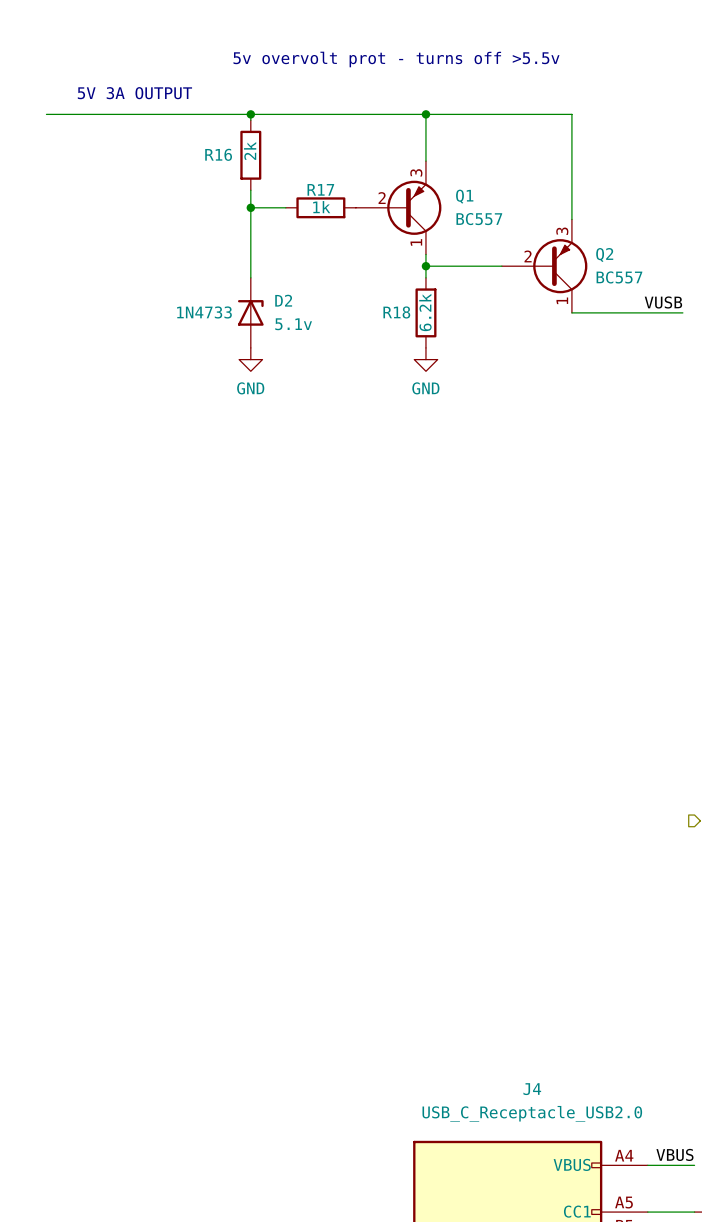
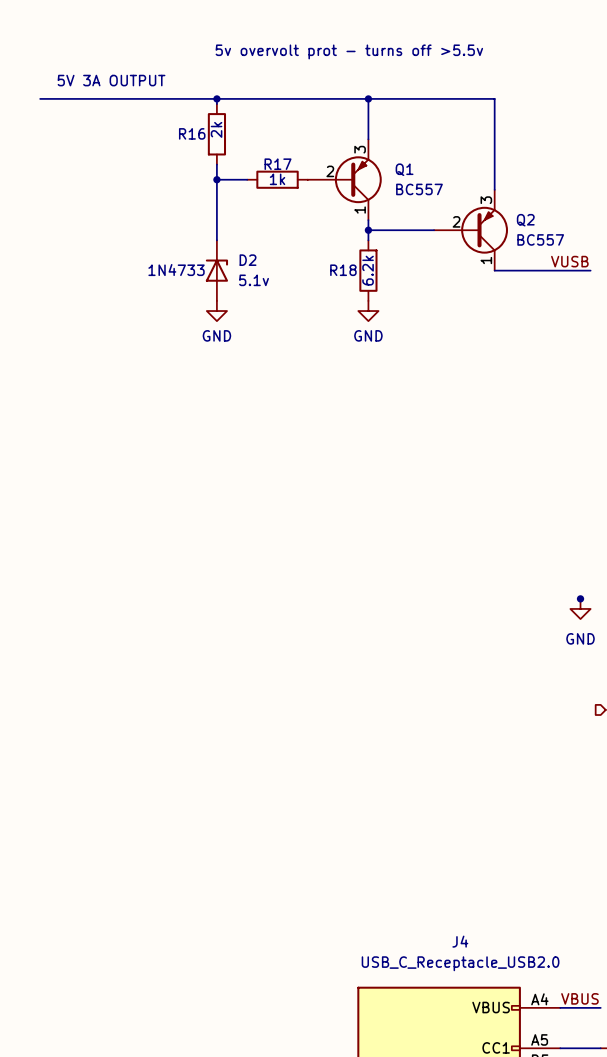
junction: none -> (580, 598)
power symbol: none -> GND (580, 608)

